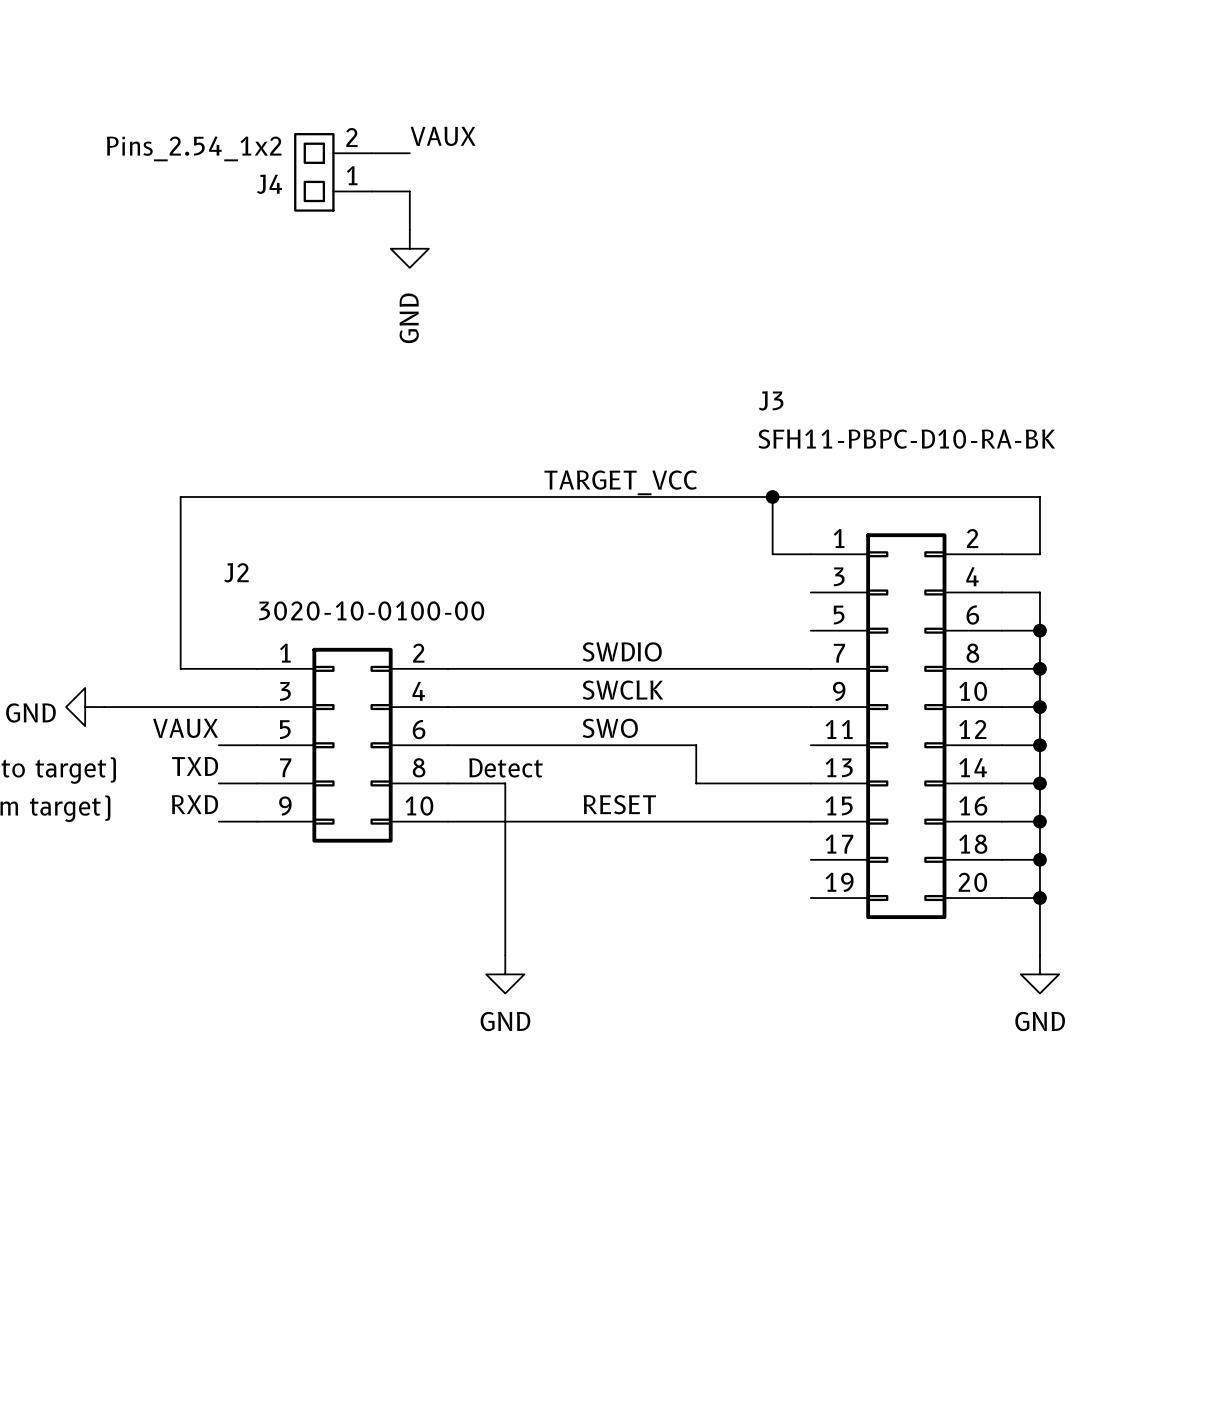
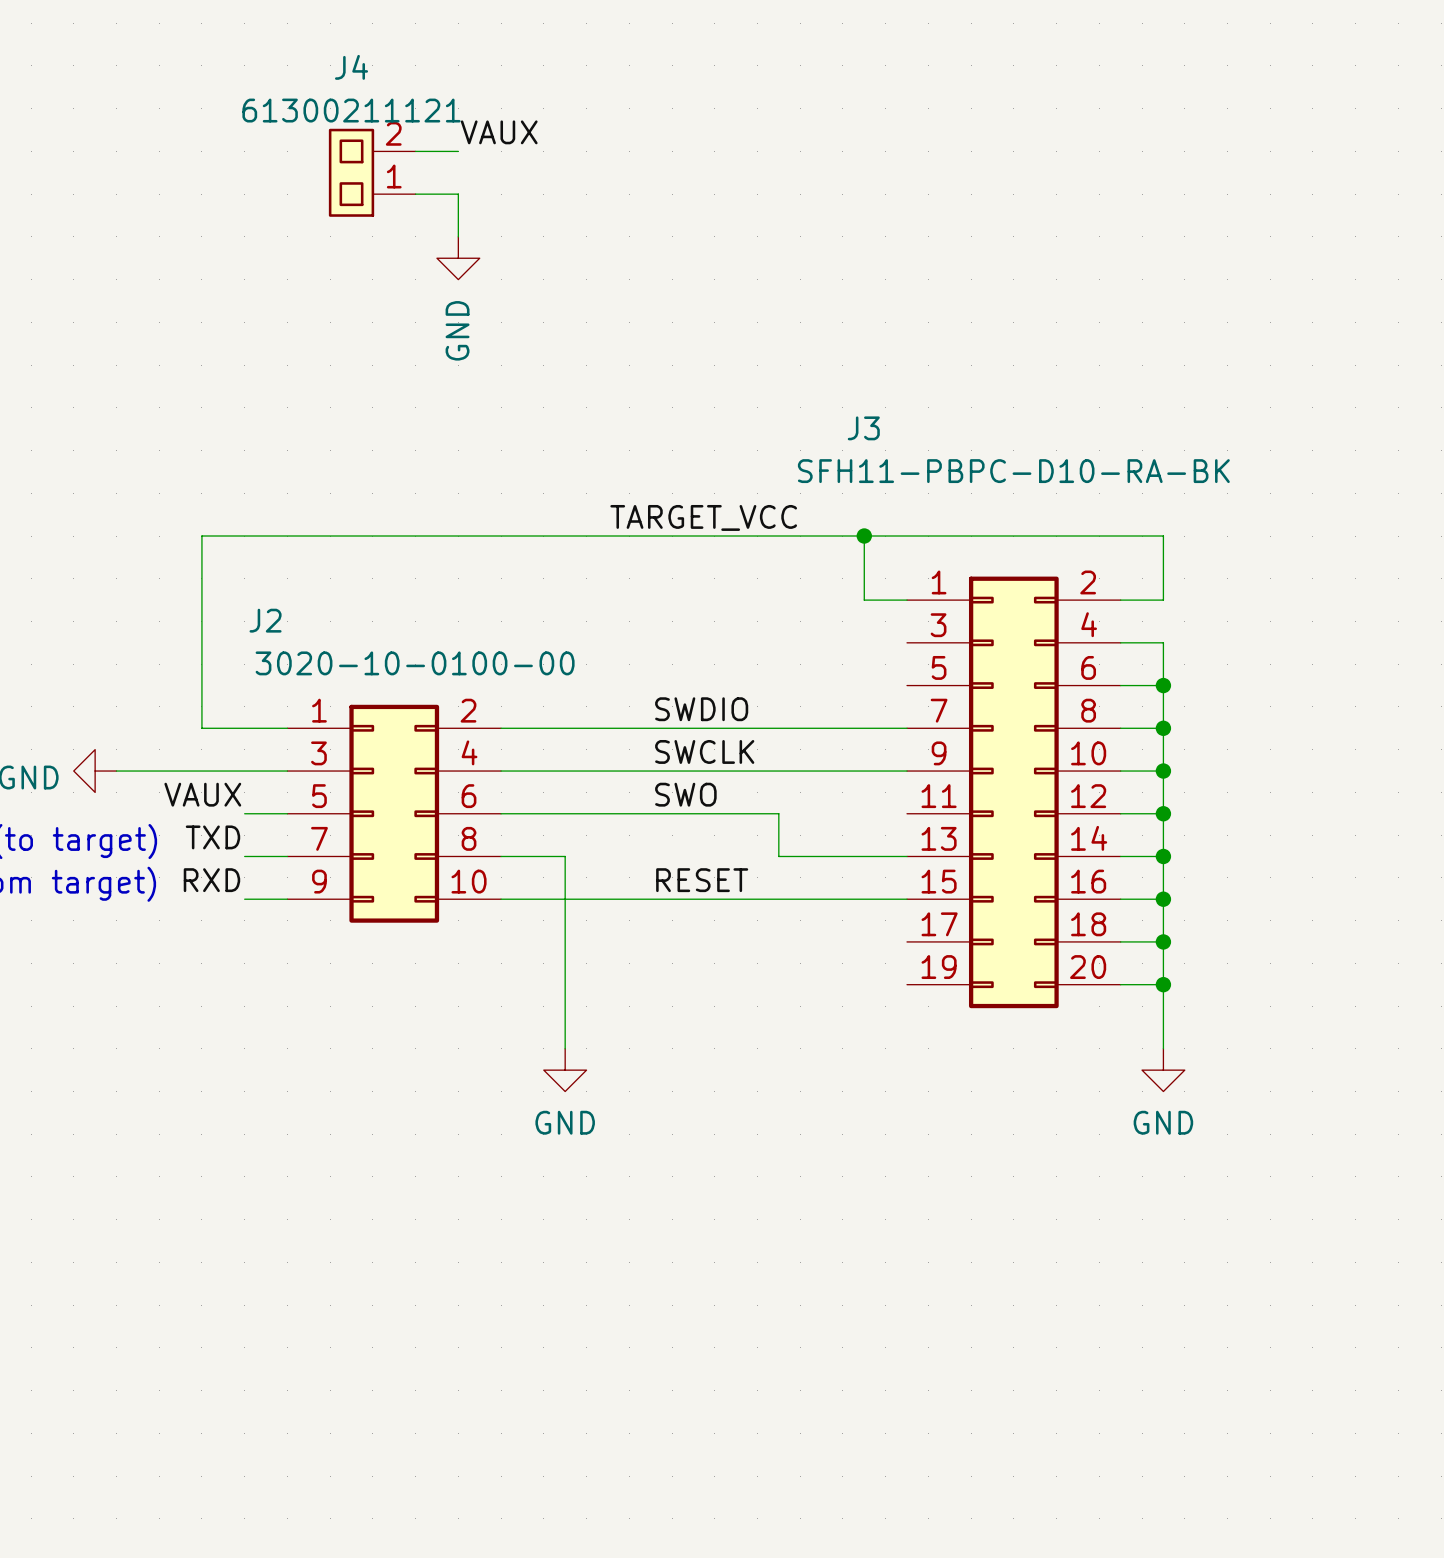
J4 value: Pins_2.54_1x2 (194, 148) -> 61300211121 (351, 110)
J4 name position: J4 (269, 184) -> J4 (351, 67)
text: Detect (506, 767) -> none

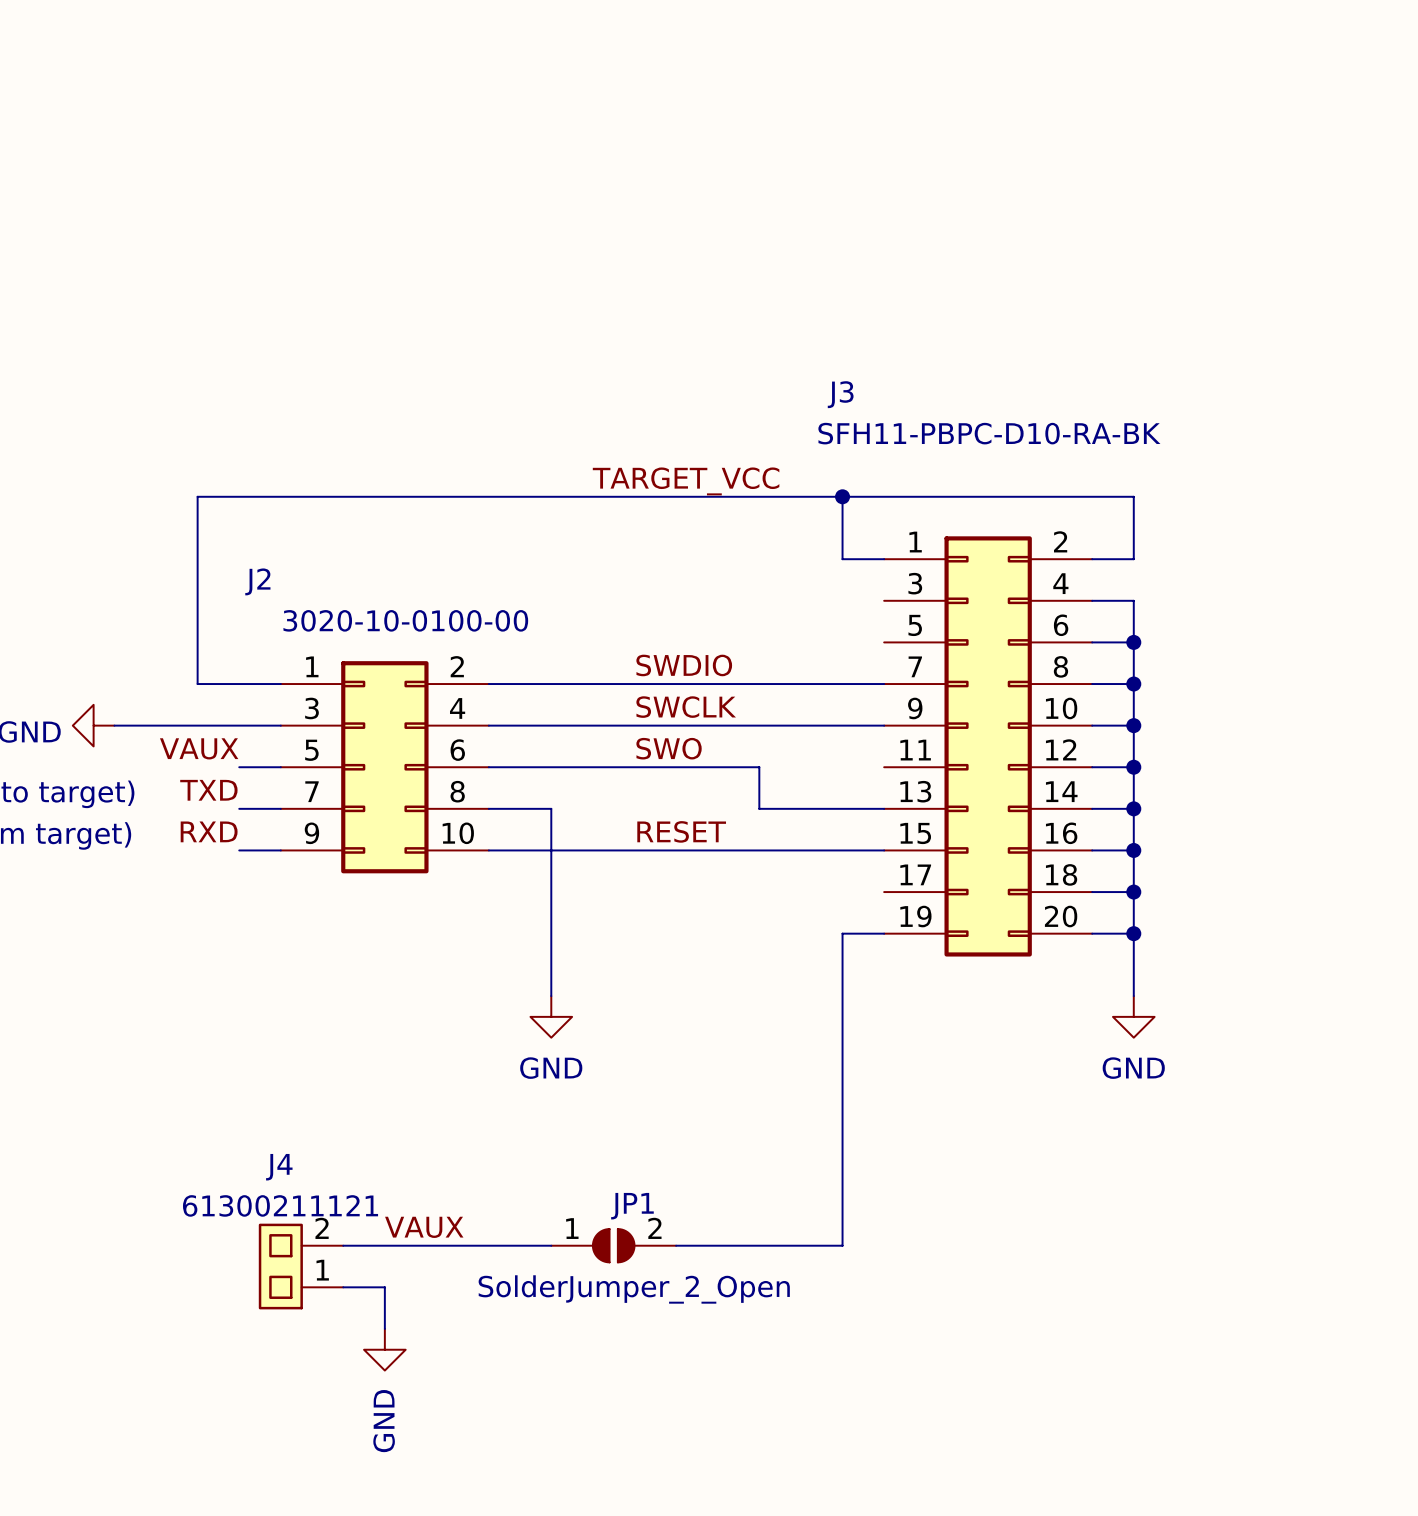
label: VAUX (499, 132) -> none
wire: (415, 151) (458, 151) -> none
J4 position: (372, 172) -> (301, 1266)
wire: (415, 194) (458, 194) (458, 236) -> none
power symbol: GND (458, 258) -> none
wire: none -> (884, 933) (842, 933) (842, 1245) (676, 1245)
label: none -> VAUX (424, 1227)
wire: none -> (343, 1245) (551, 1245)
JP1: none -> SolderJumper_2_Open (613, 1245)
wire: none -> (343, 1287) (384, 1287) (384, 1328)
power symbol: none -> GND (384, 1349)

